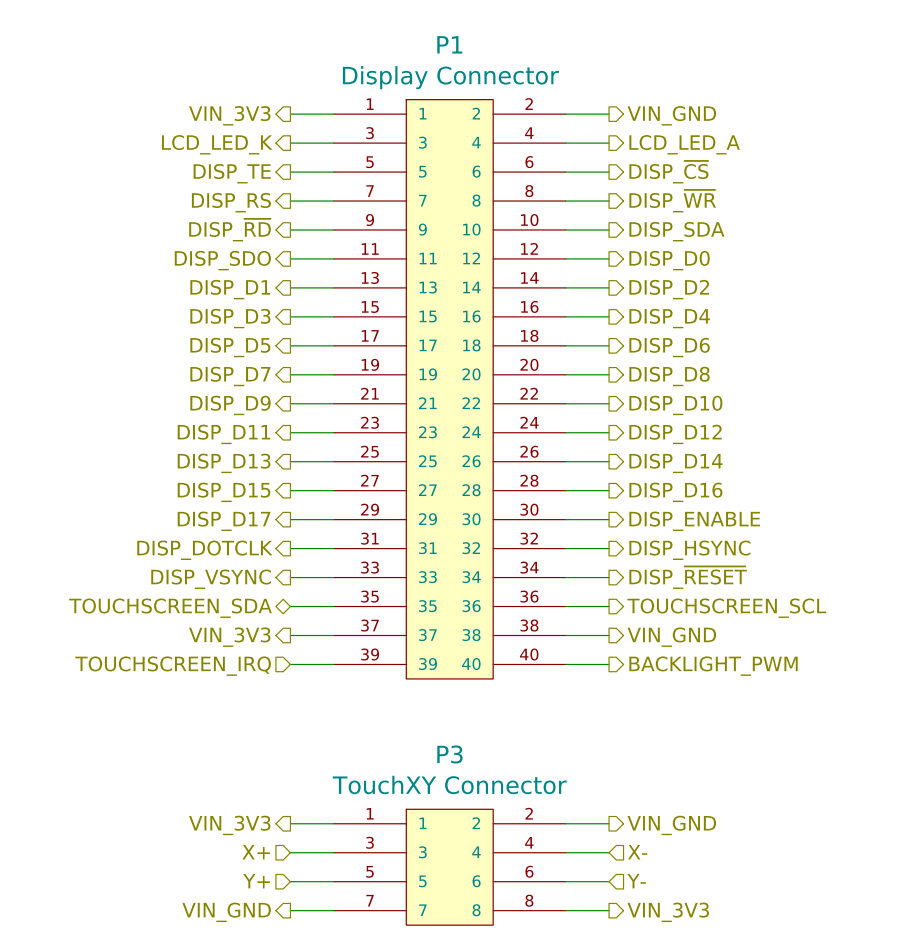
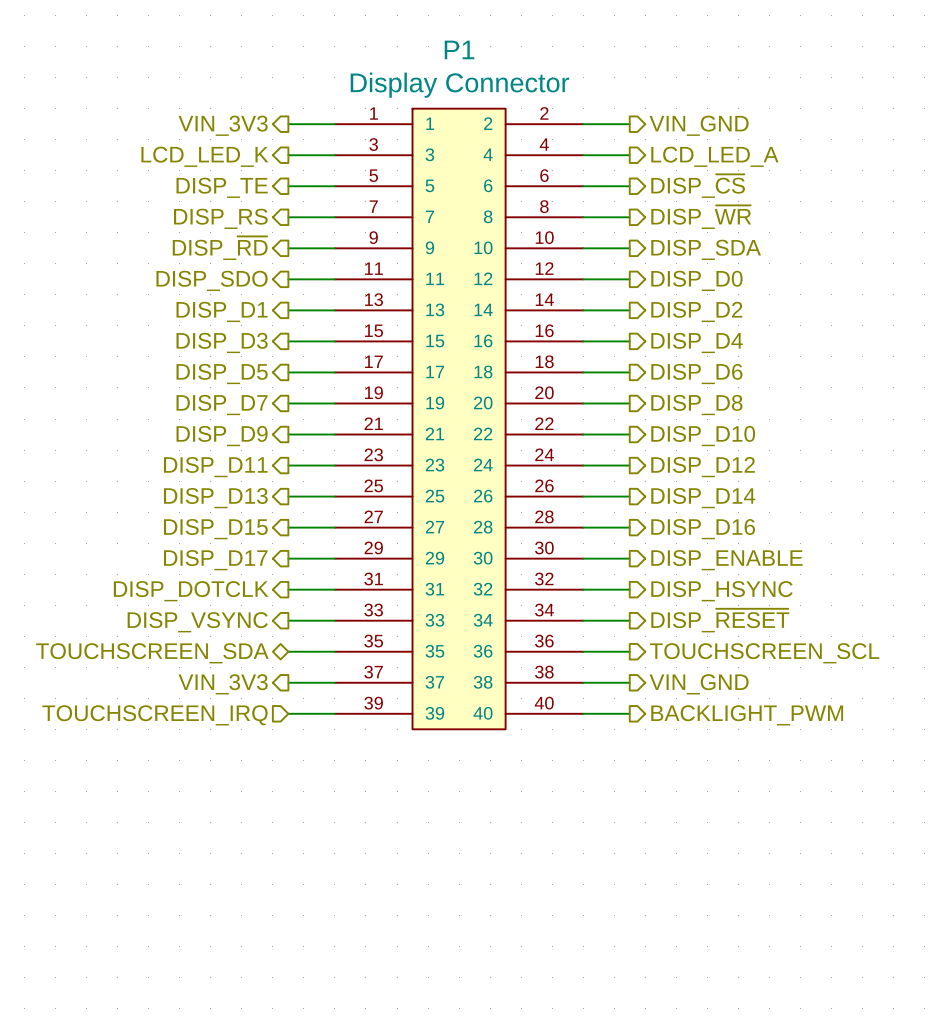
wire: (290, 823) (333, 823) -> none
wire: (565, 823) (609, 823) -> none
hierarchical label: VIN_3V3 (229, 825) -> none
hierarchical label: VIN_GND (671, 825) -> none
hierarchical label: X+ (256, 852) -> none
wire: (290, 852) (333, 852) -> none
wire: (565, 852) (609, 852) -> none
hierarchical label: X- (637, 852) -> none
P3: TouchXY Connector (449, 867) -> none
hierarchical label: Y+ (256, 881) -> none
wire: (290, 881) (333, 881) -> none
wire: (565, 881) (609, 881) -> none
hierarchical label: Y- (636, 881) -> none
wire: (290, 910) (333, 910) -> none
wire: (565, 910) (609, 910) -> none
hierarchical label: VIN_GND (226, 912) -> none
hierarchical label: VIN_3V3 (668, 912) -> none

